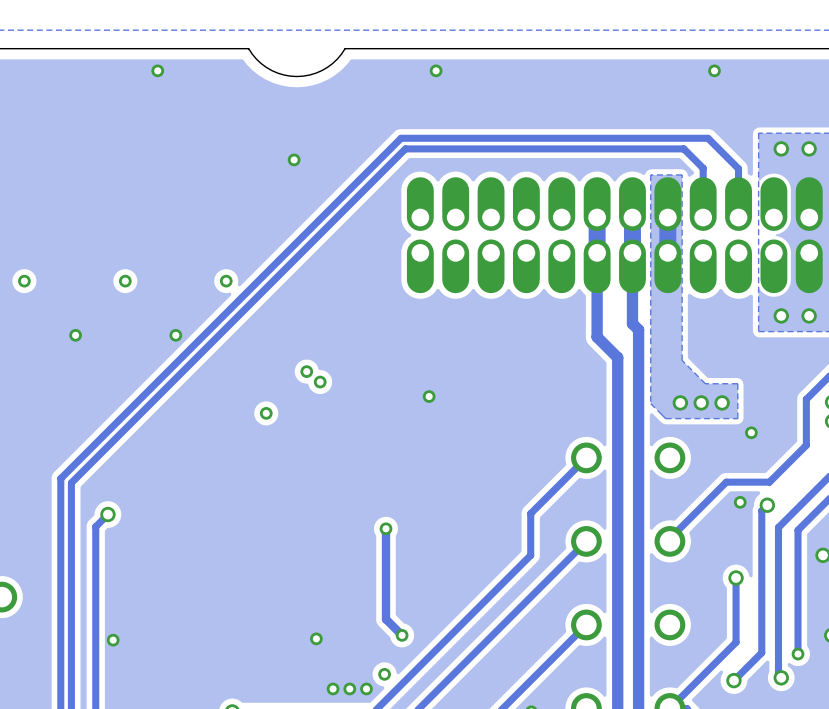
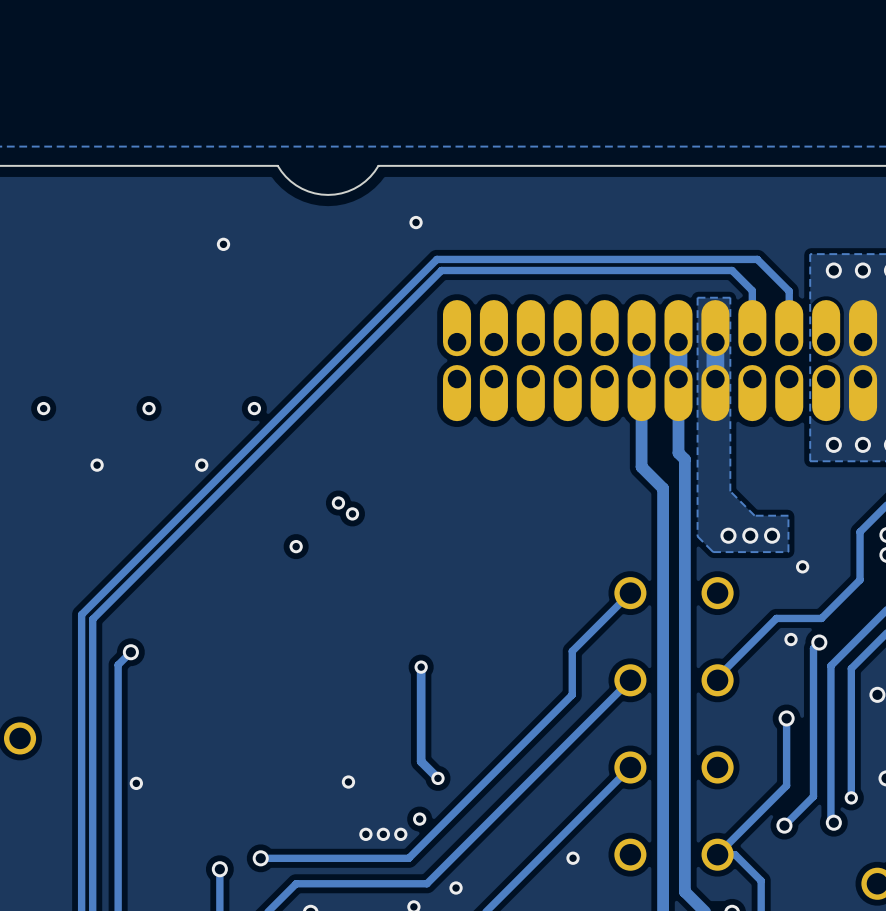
via: (157, 70) -> none
via: (436, 70) -> none
via: (714, 70) -> none
via: none -> (416, 222)
via: none -> (223, 244)
via: (294, 159) -> none
via: (429, 396) -> none

